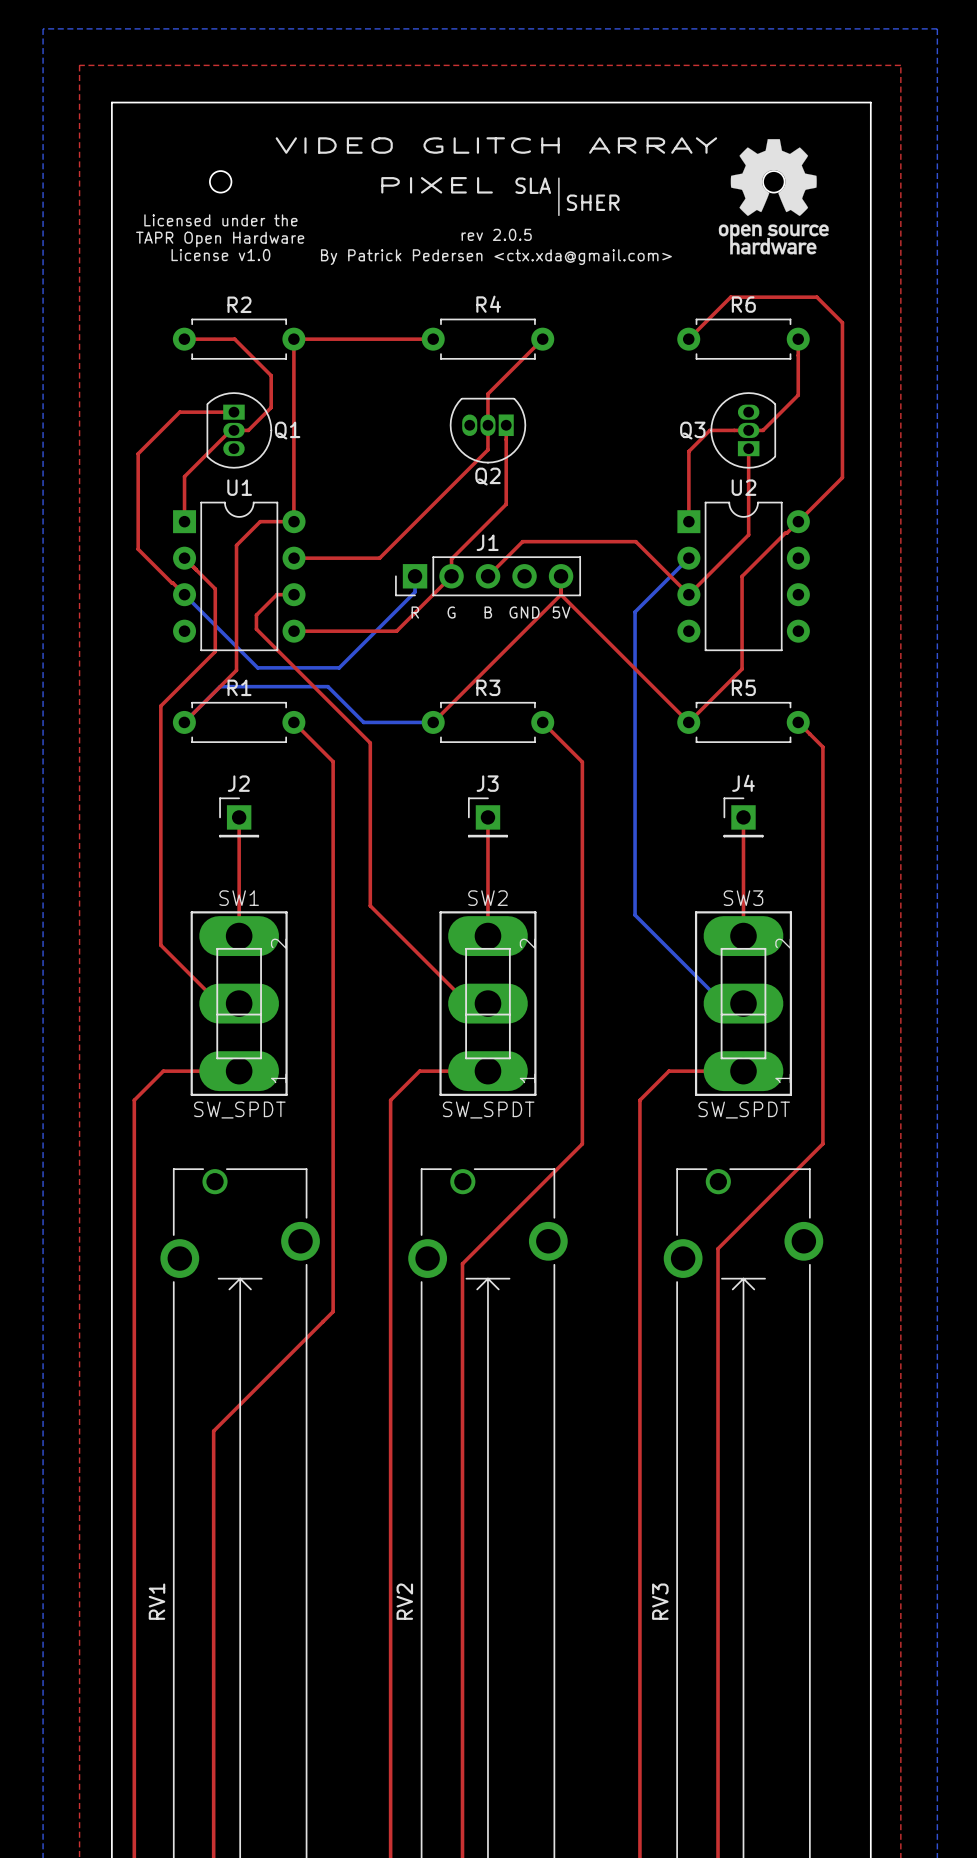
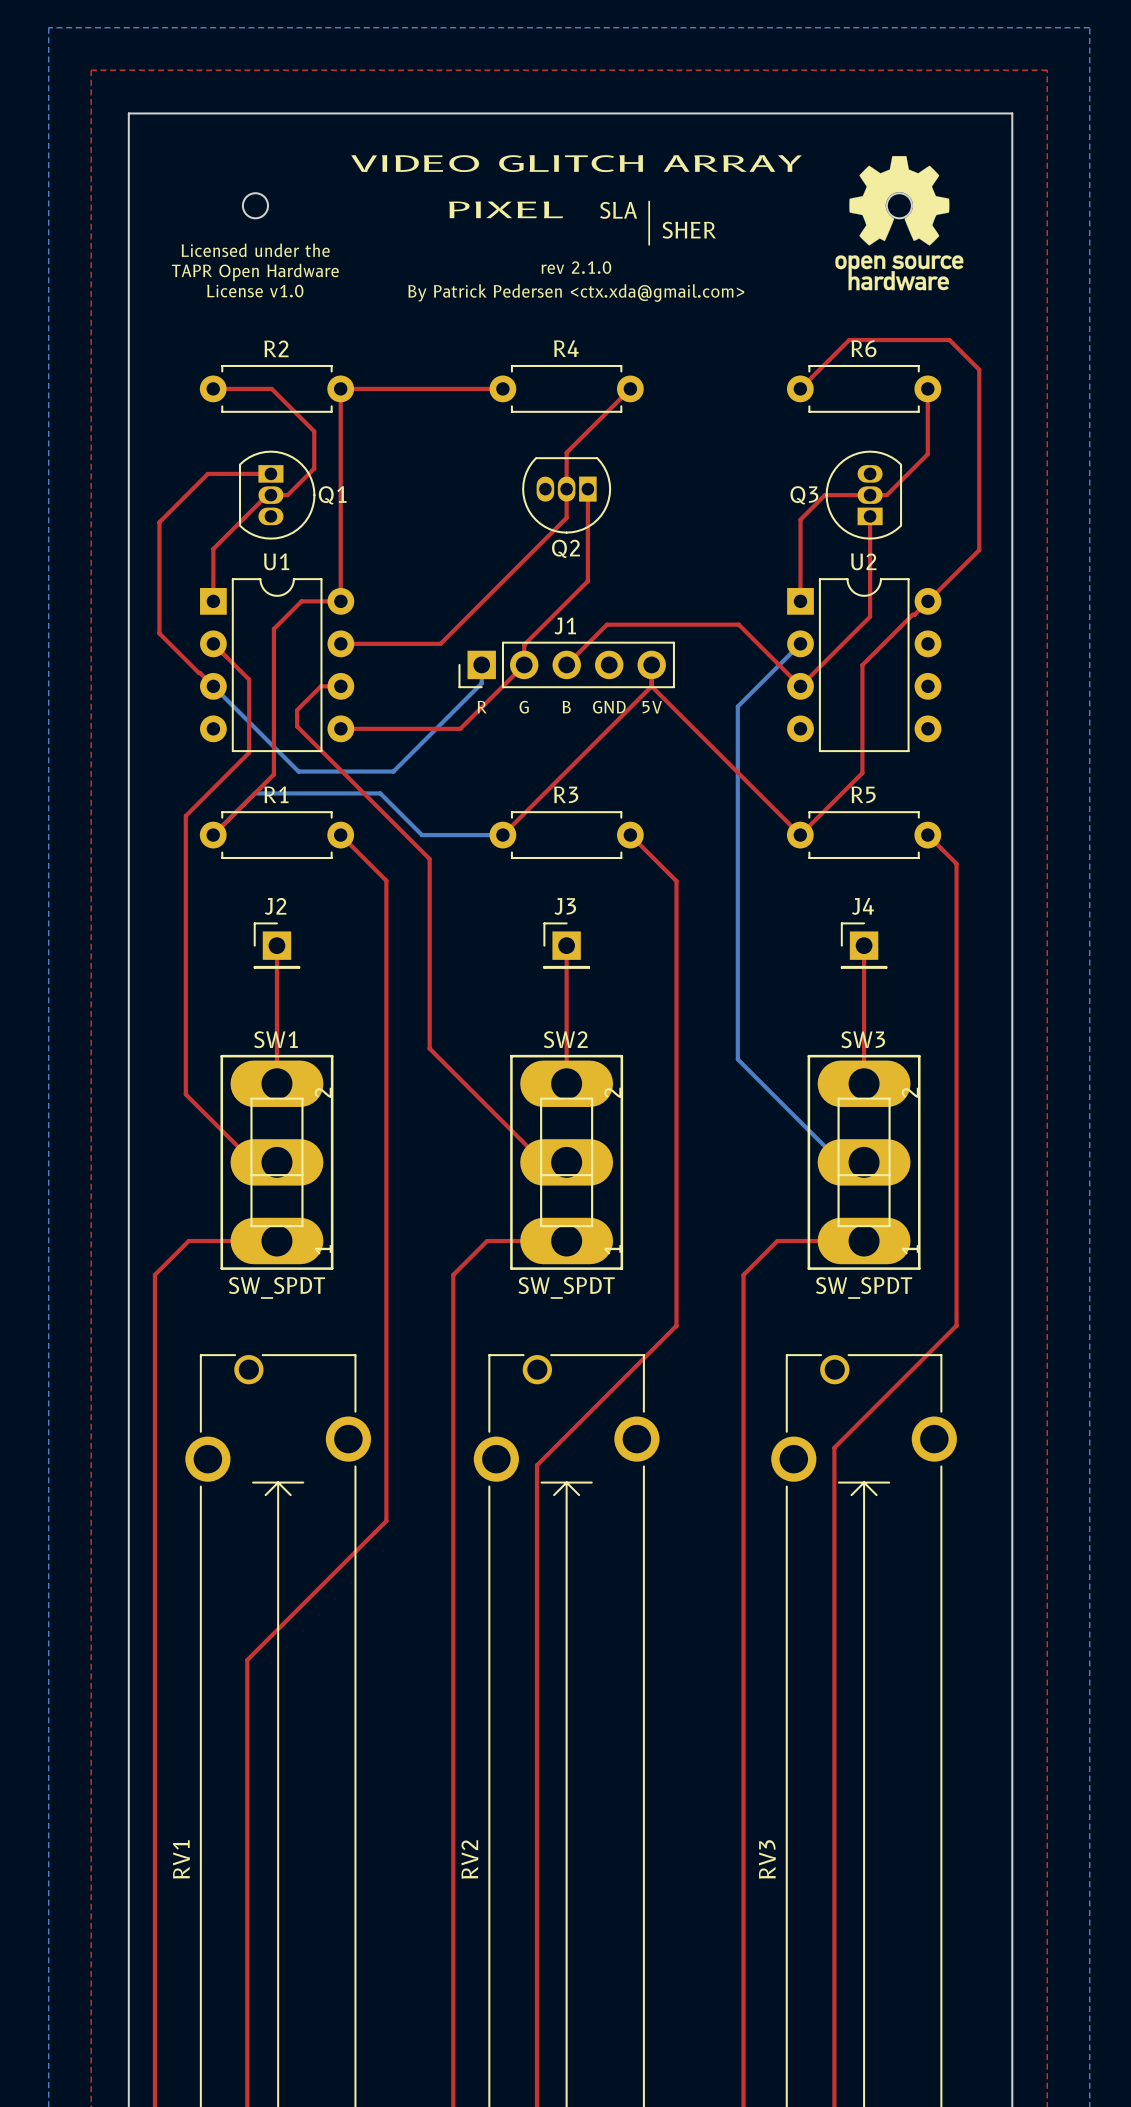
text: rev 2.0.5 (496, 234) -> rev 2.1.0 (576, 267)

